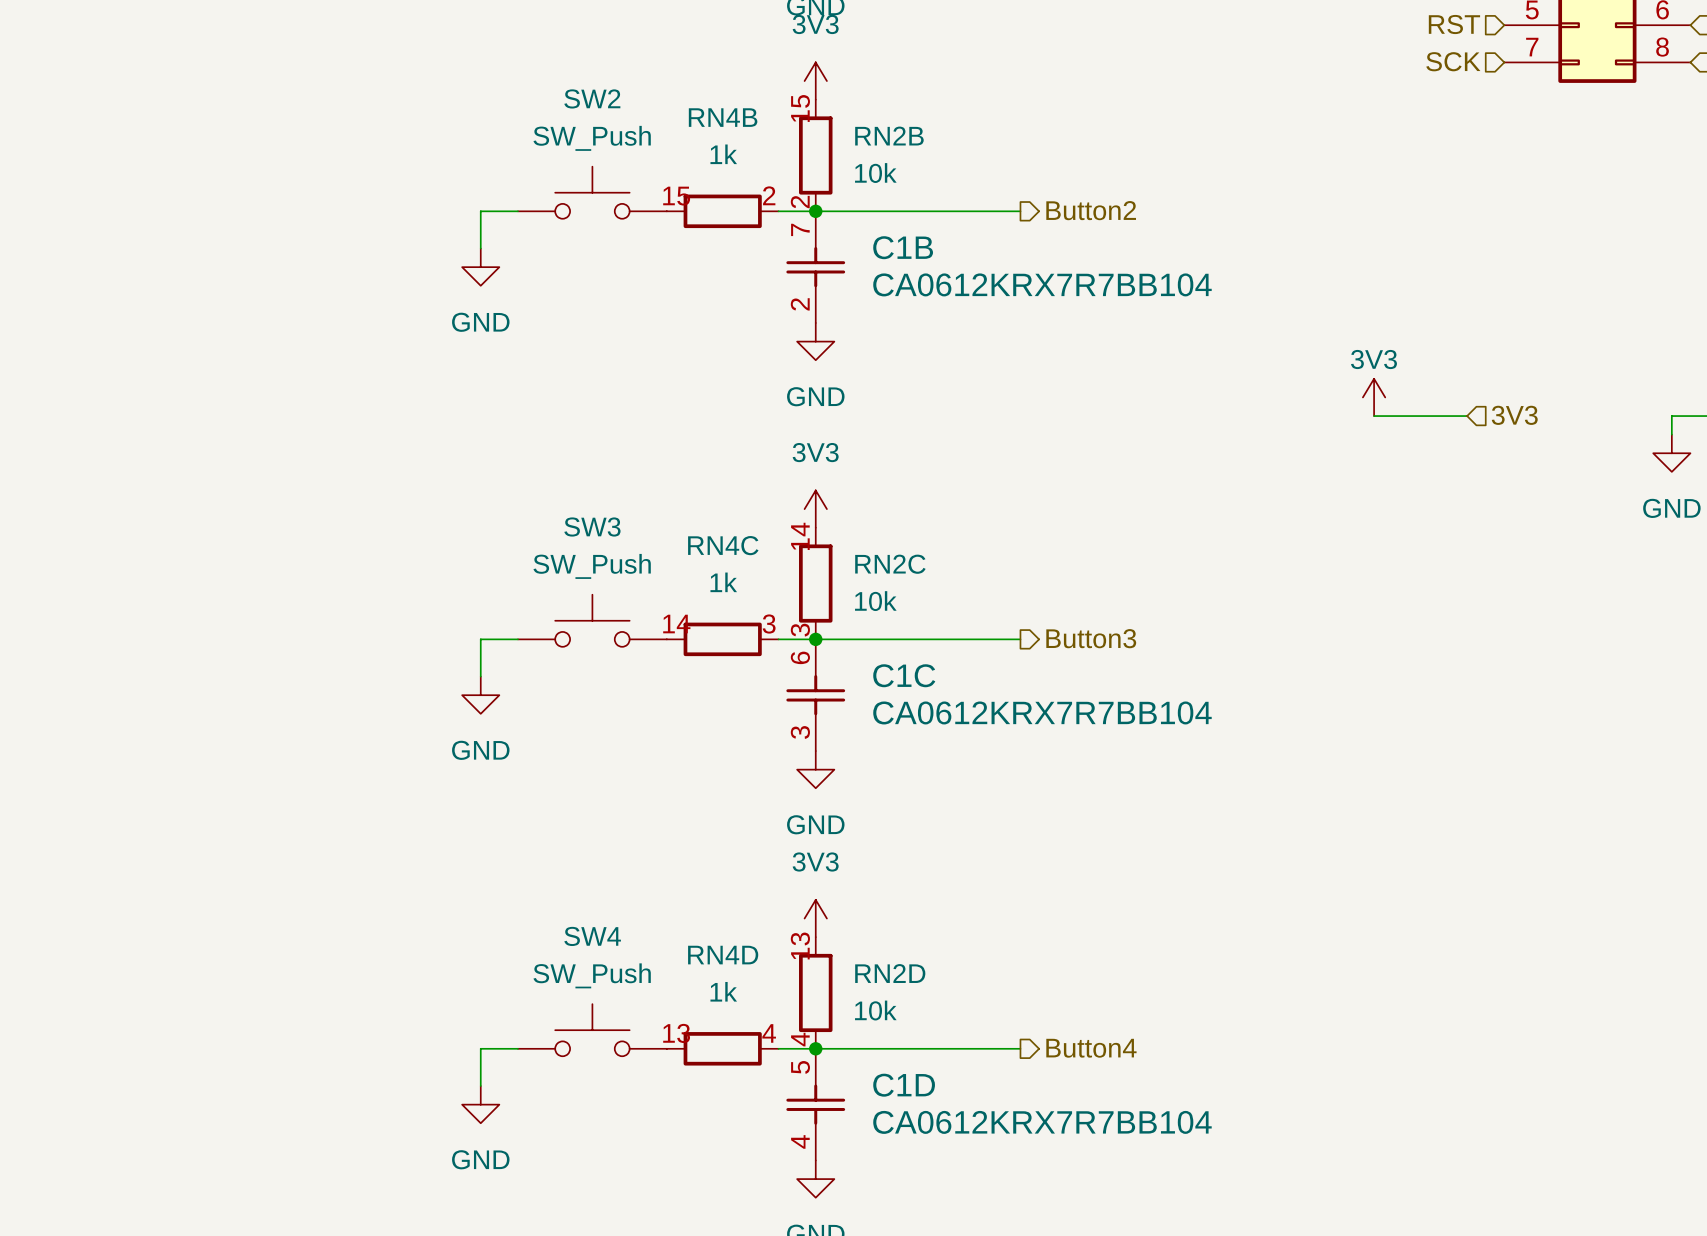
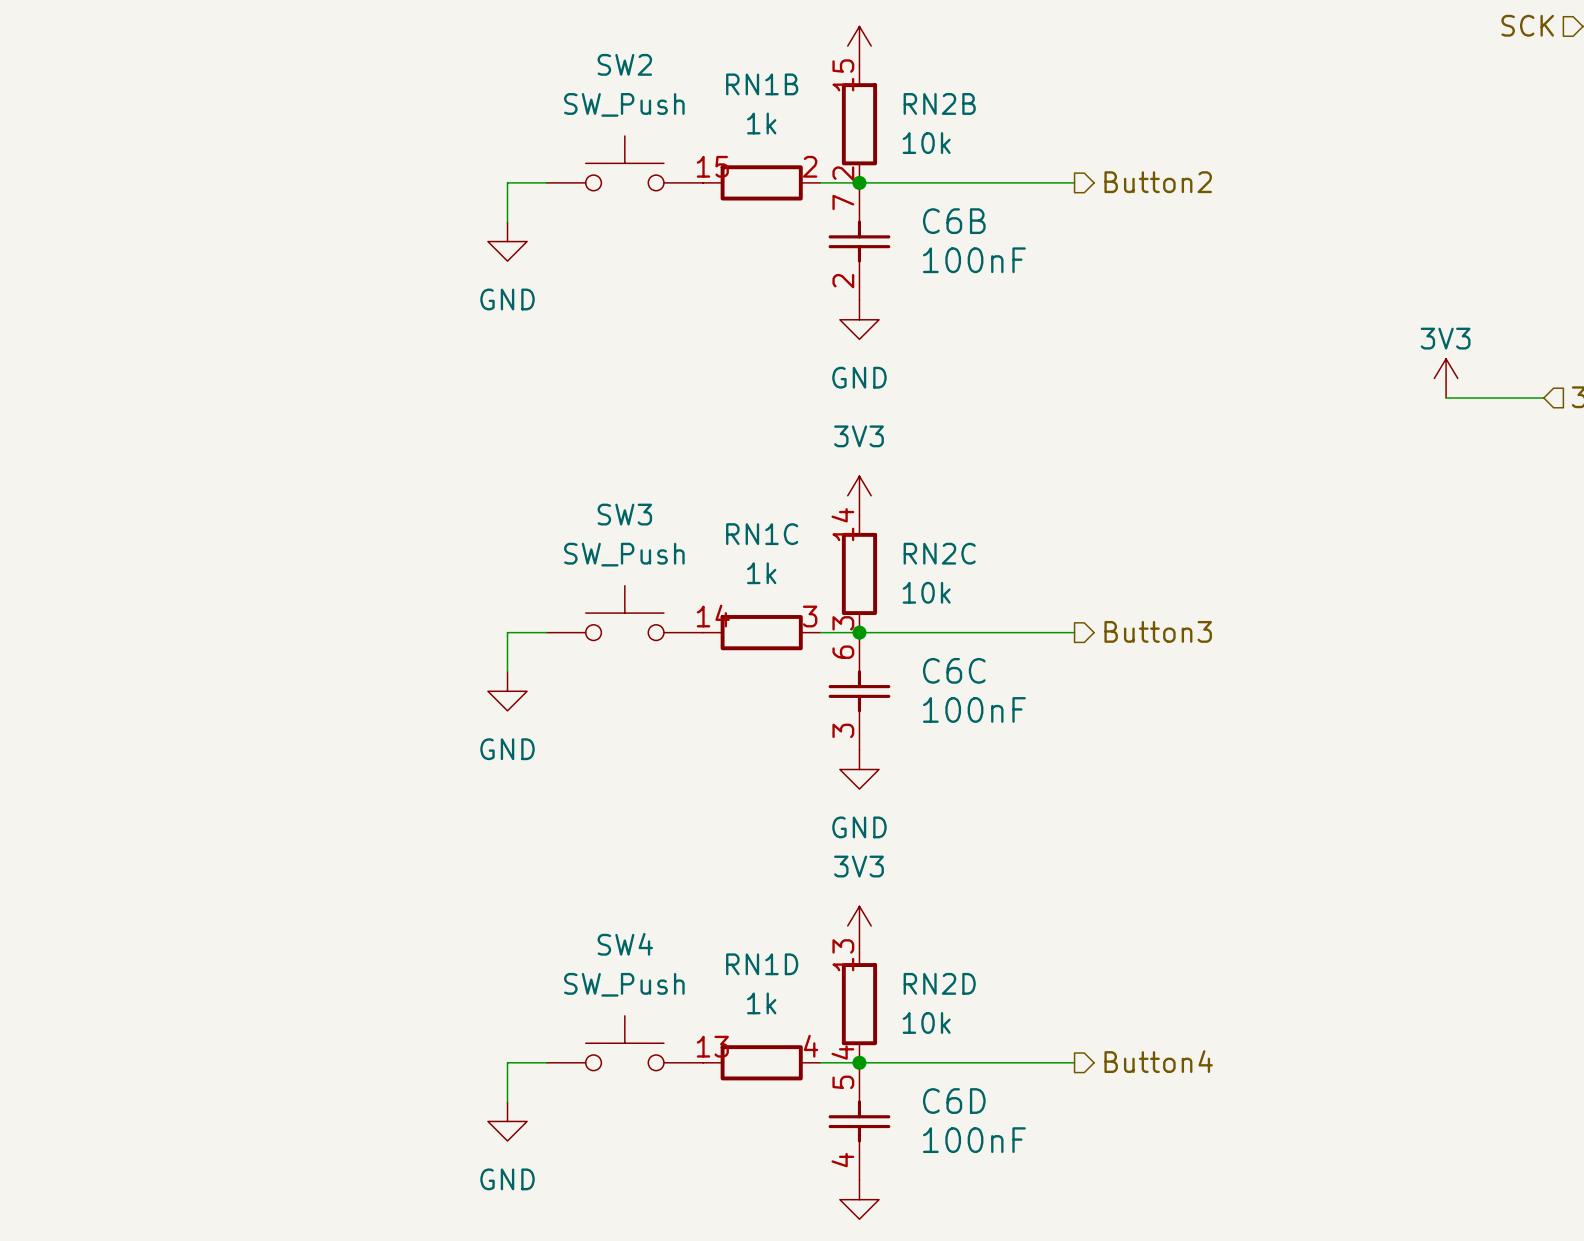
RN4B name: RN4B (723, 117) -> RN1B (762, 84)
C1B name: C1B (903, 247) -> C6B (954, 221)
C1B value: CA0612KRX7R7BB104 (1042, 284) -> 100nF (974, 260)
RN4C name: RN4C (723, 545) -> RN1C (762, 534)
C1C name: C1C (904, 675) -> C6C (954, 670)
C1C value: CA0612KRX7R7BB104 (1042, 712) -> 100nF (974, 709)
RN4D name: RN4D (723, 955) -> RN1D (762, 964)
C1D name: C1D (904, 1085) -> C6D (954, 1101)
C1D value: CA0612KRX7R7BB104 (1042, 1122) -> 100nF (974, 1140)

